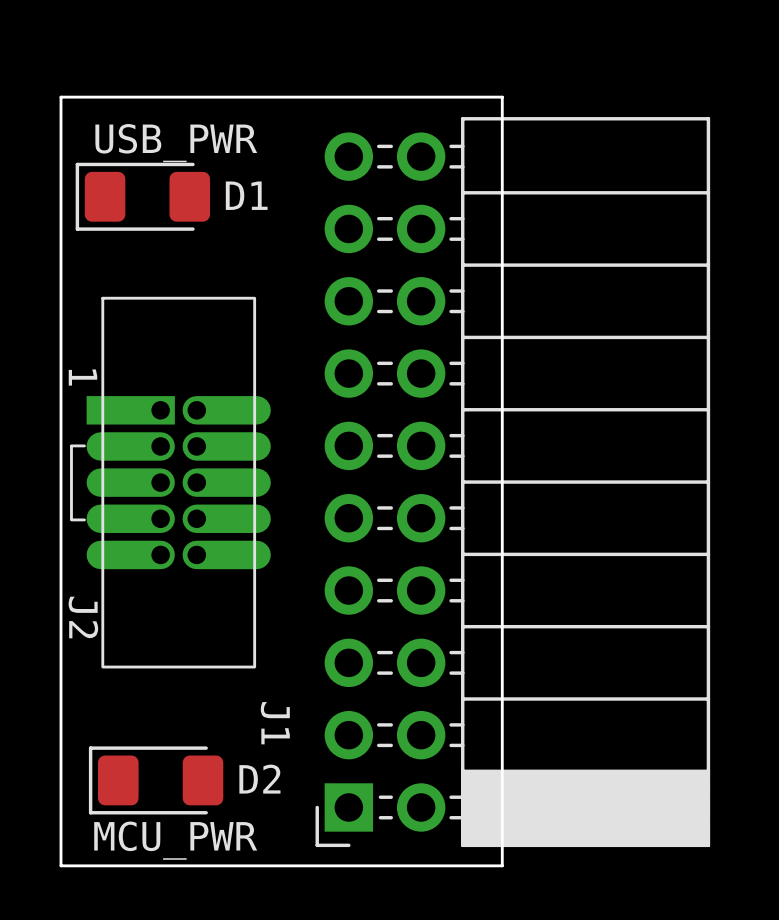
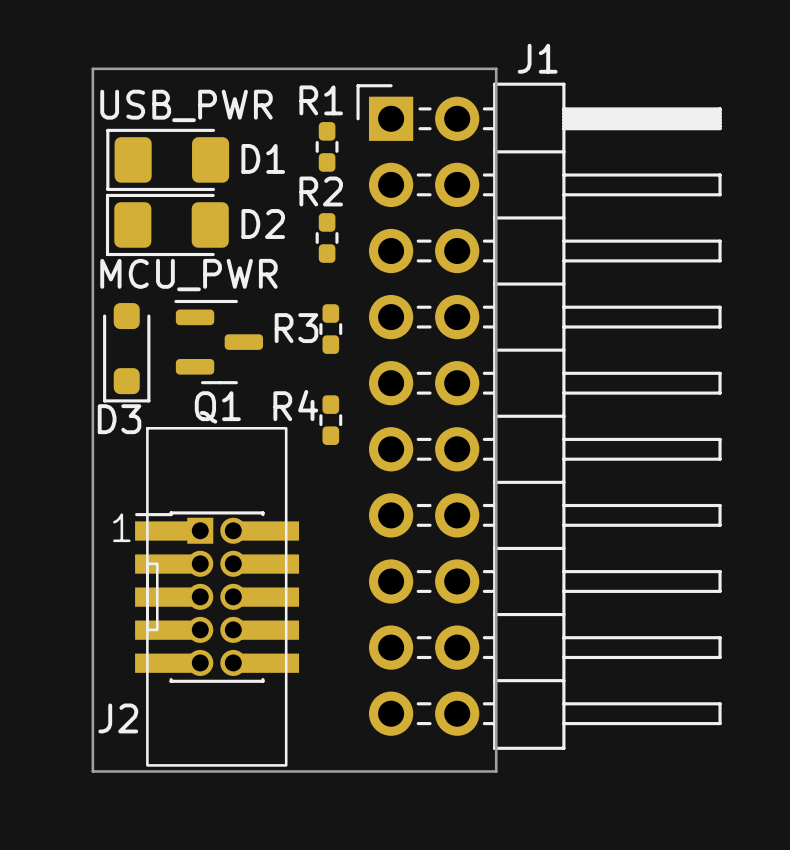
J1 footprint: [315, 117, 711, 848] -> [356, 82, 722, 750]
text: none -> USB_PWR (186, 105)
D1 text: USB_PWR (176, 143) -> none
R1: none -> (327, 146)
R2: none -> (327, 237)
J2 footprint: [70, 296, 271, 669] -> [146, 426, 288, 767]
text: none -> MCU_PWR (188, 275)
R3: none -> (330, 329)
Q1: none -> (218, 342)
D3: none -> (126, 352)
R4: none -> (330, 420)
part: none -> (217, 597)
J1 name position: J1 (275, 723) -> J1 (537, 58)
D2 position: (156, 780) -> (167, 224)
D2 text: MCU_PWR (175, 840) -> none

